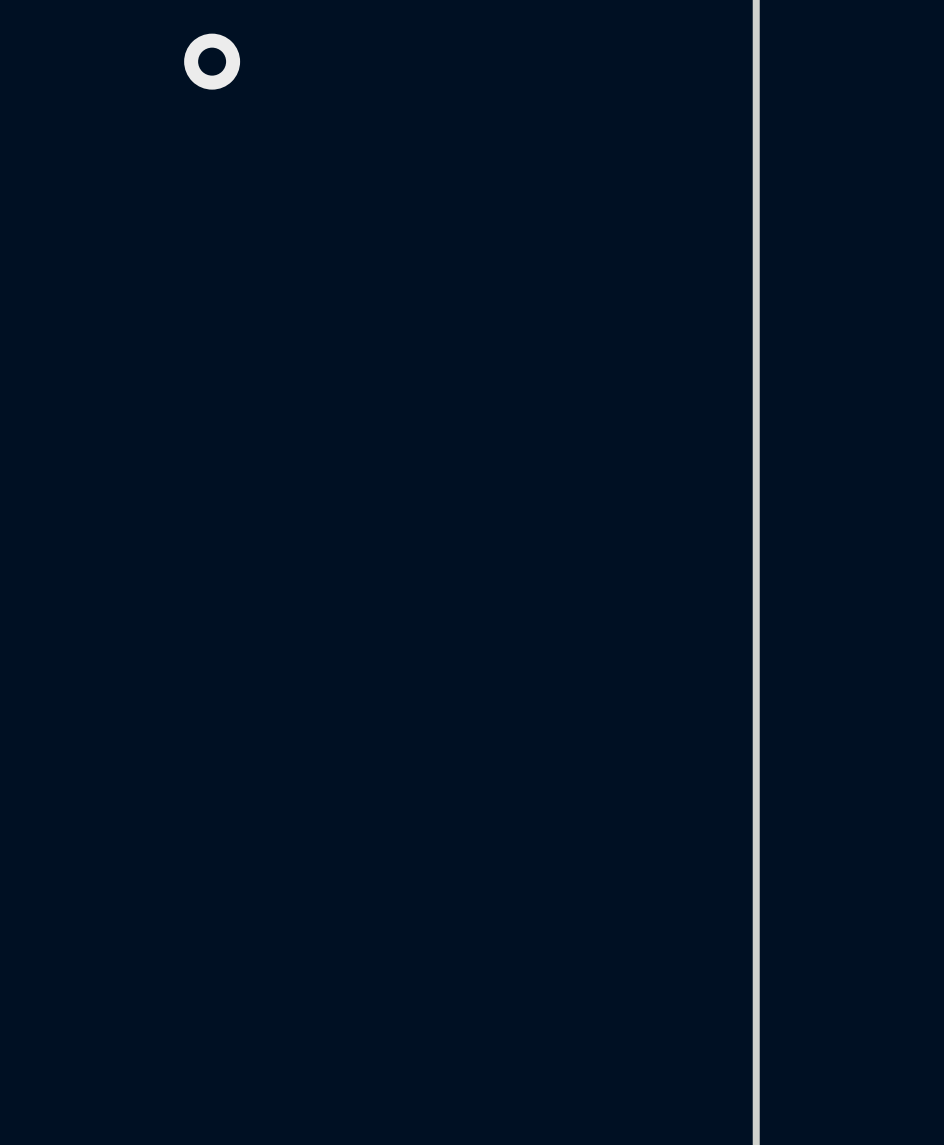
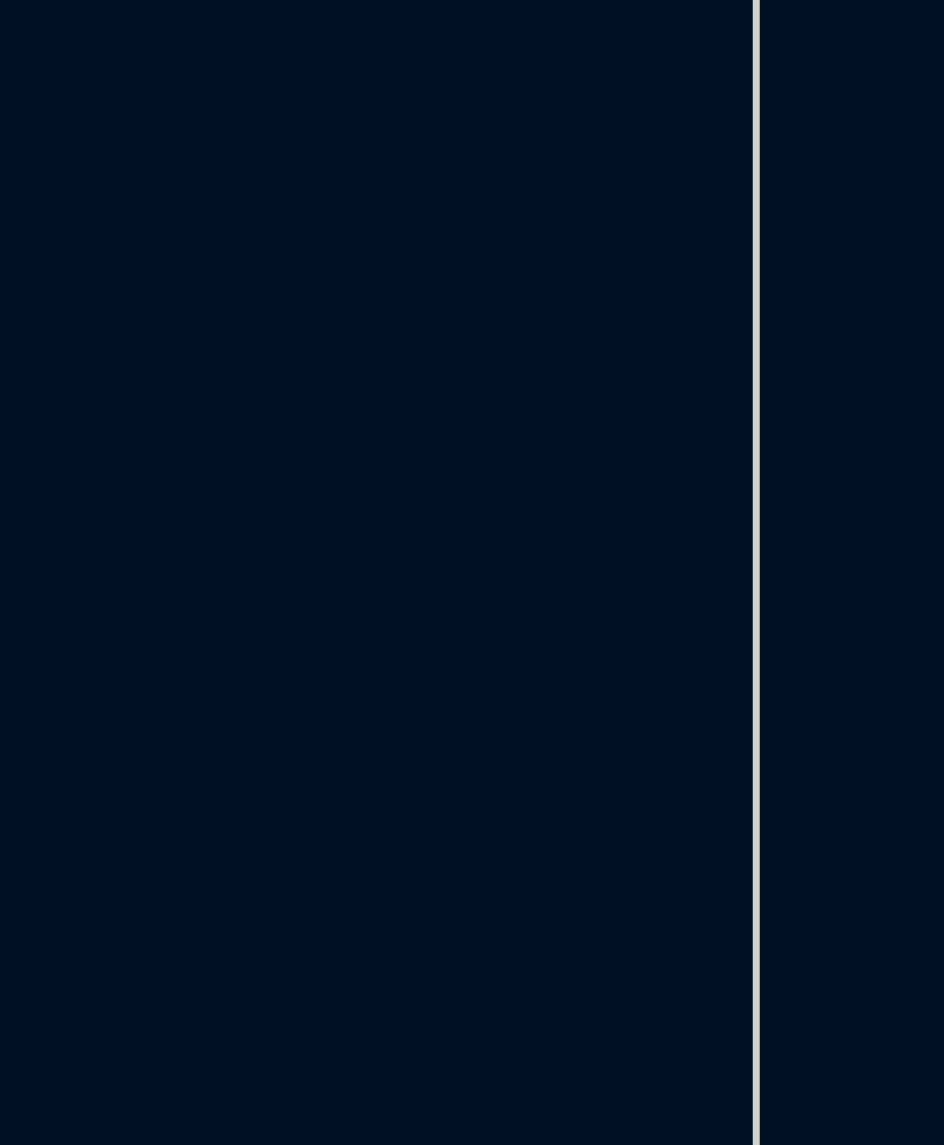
via: (212, 61) -> none

